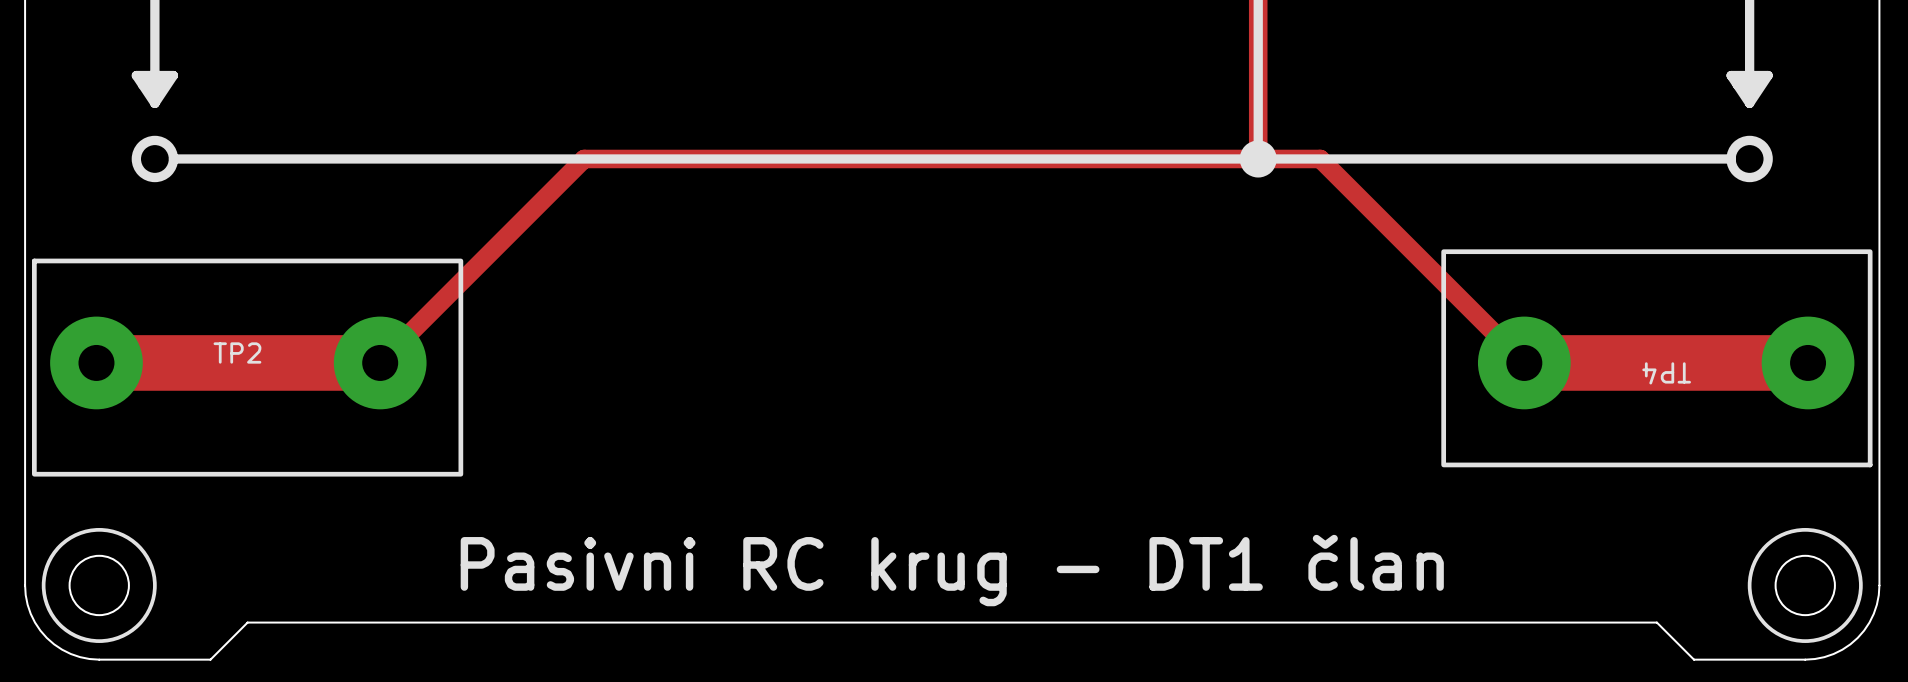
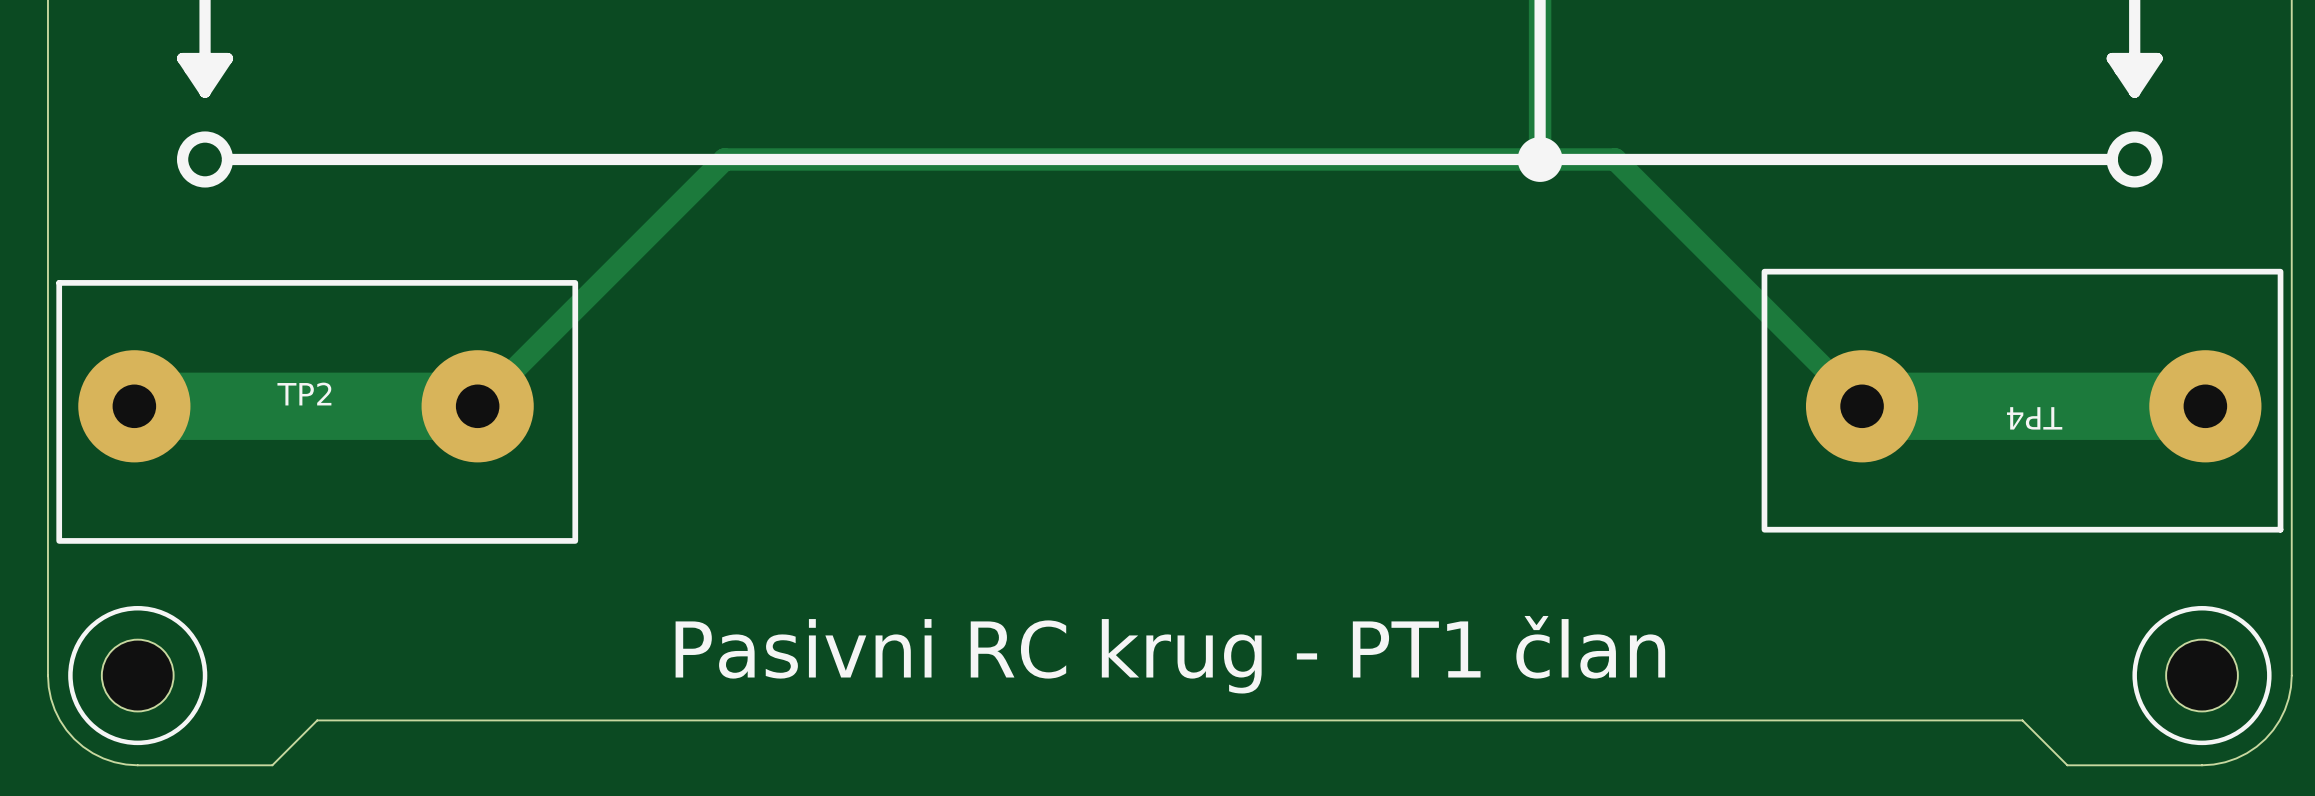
text: Pasivni RC krug - DT1 član (952, 570) -> Pasivni RC krug - PT1 član (1170, 654)

